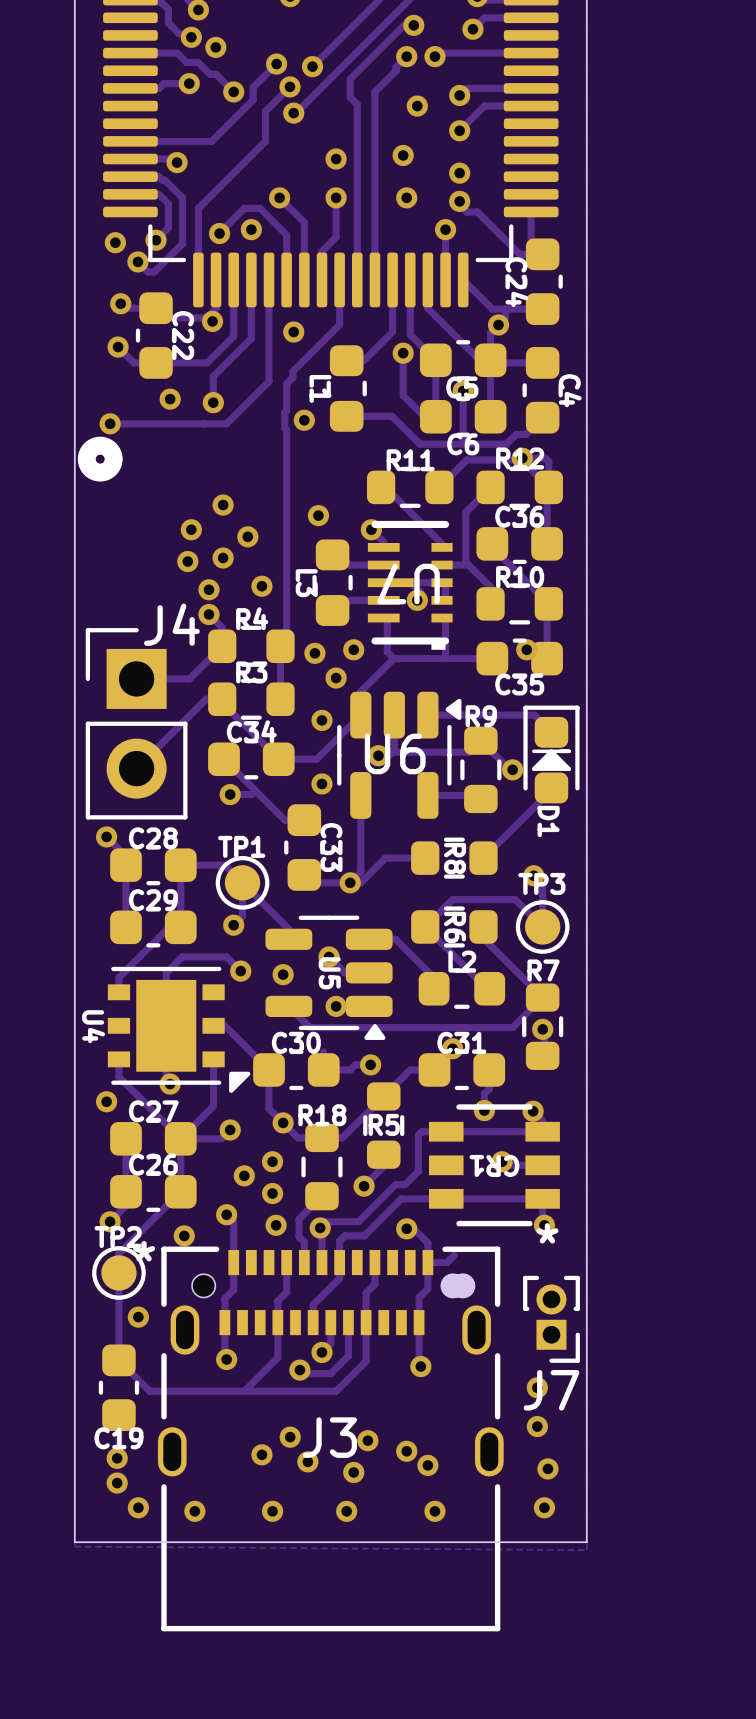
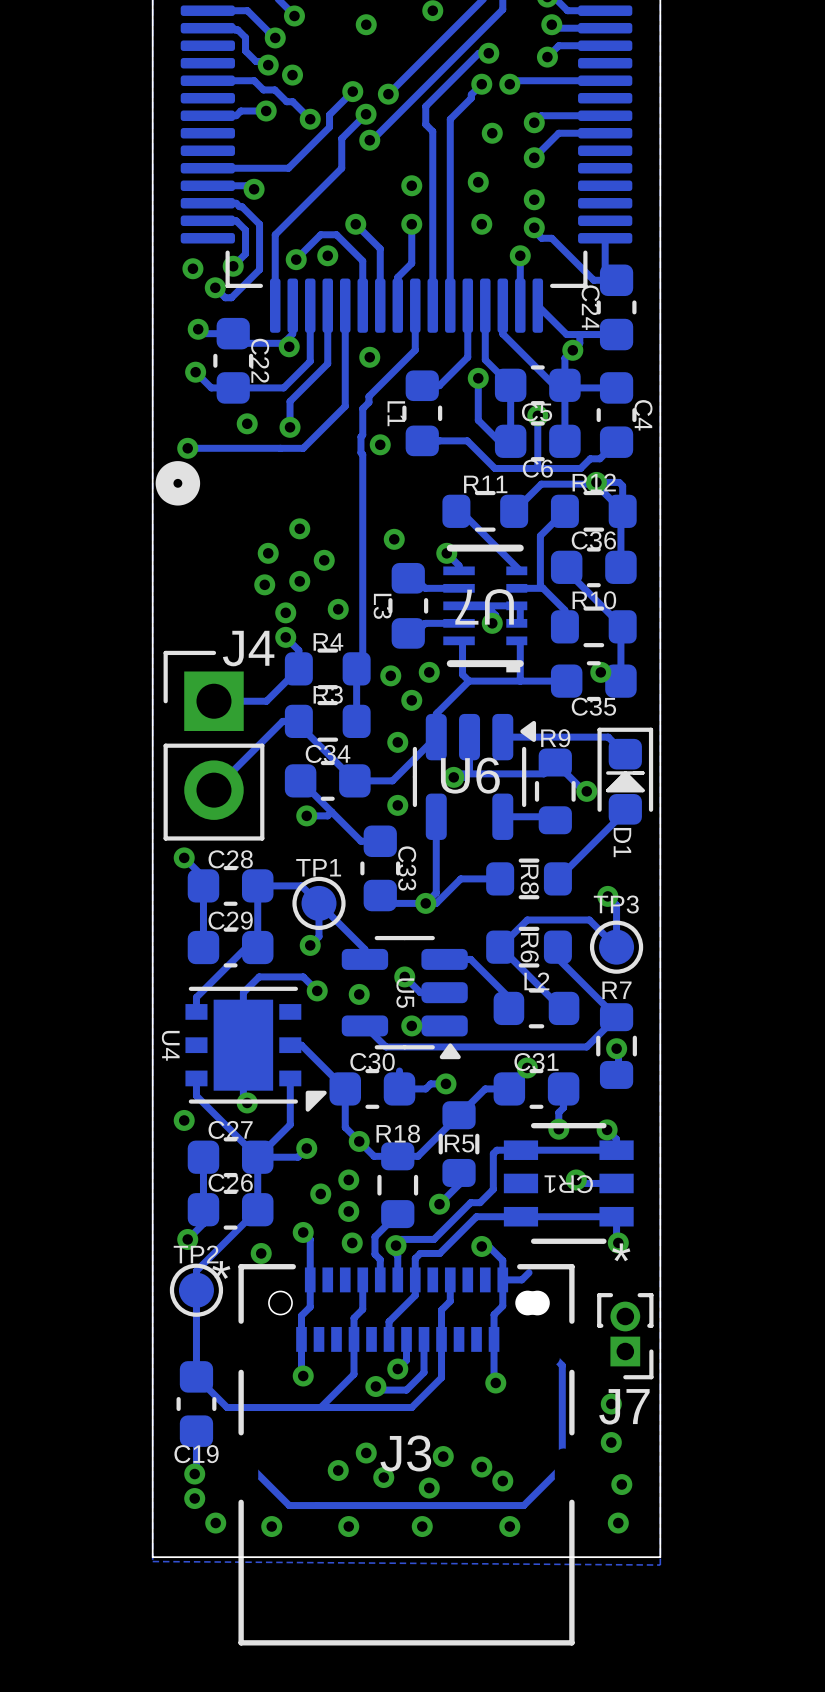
J3 footprint: [157, 1246, 504, 1632] -> [238, 1264, 575, 1646]
via: (138, 1317) -> none
track: none -> (553, 1356) (562, 1365) (562, 1467) (523, 1505) (289, 1505) (254, 1470)

